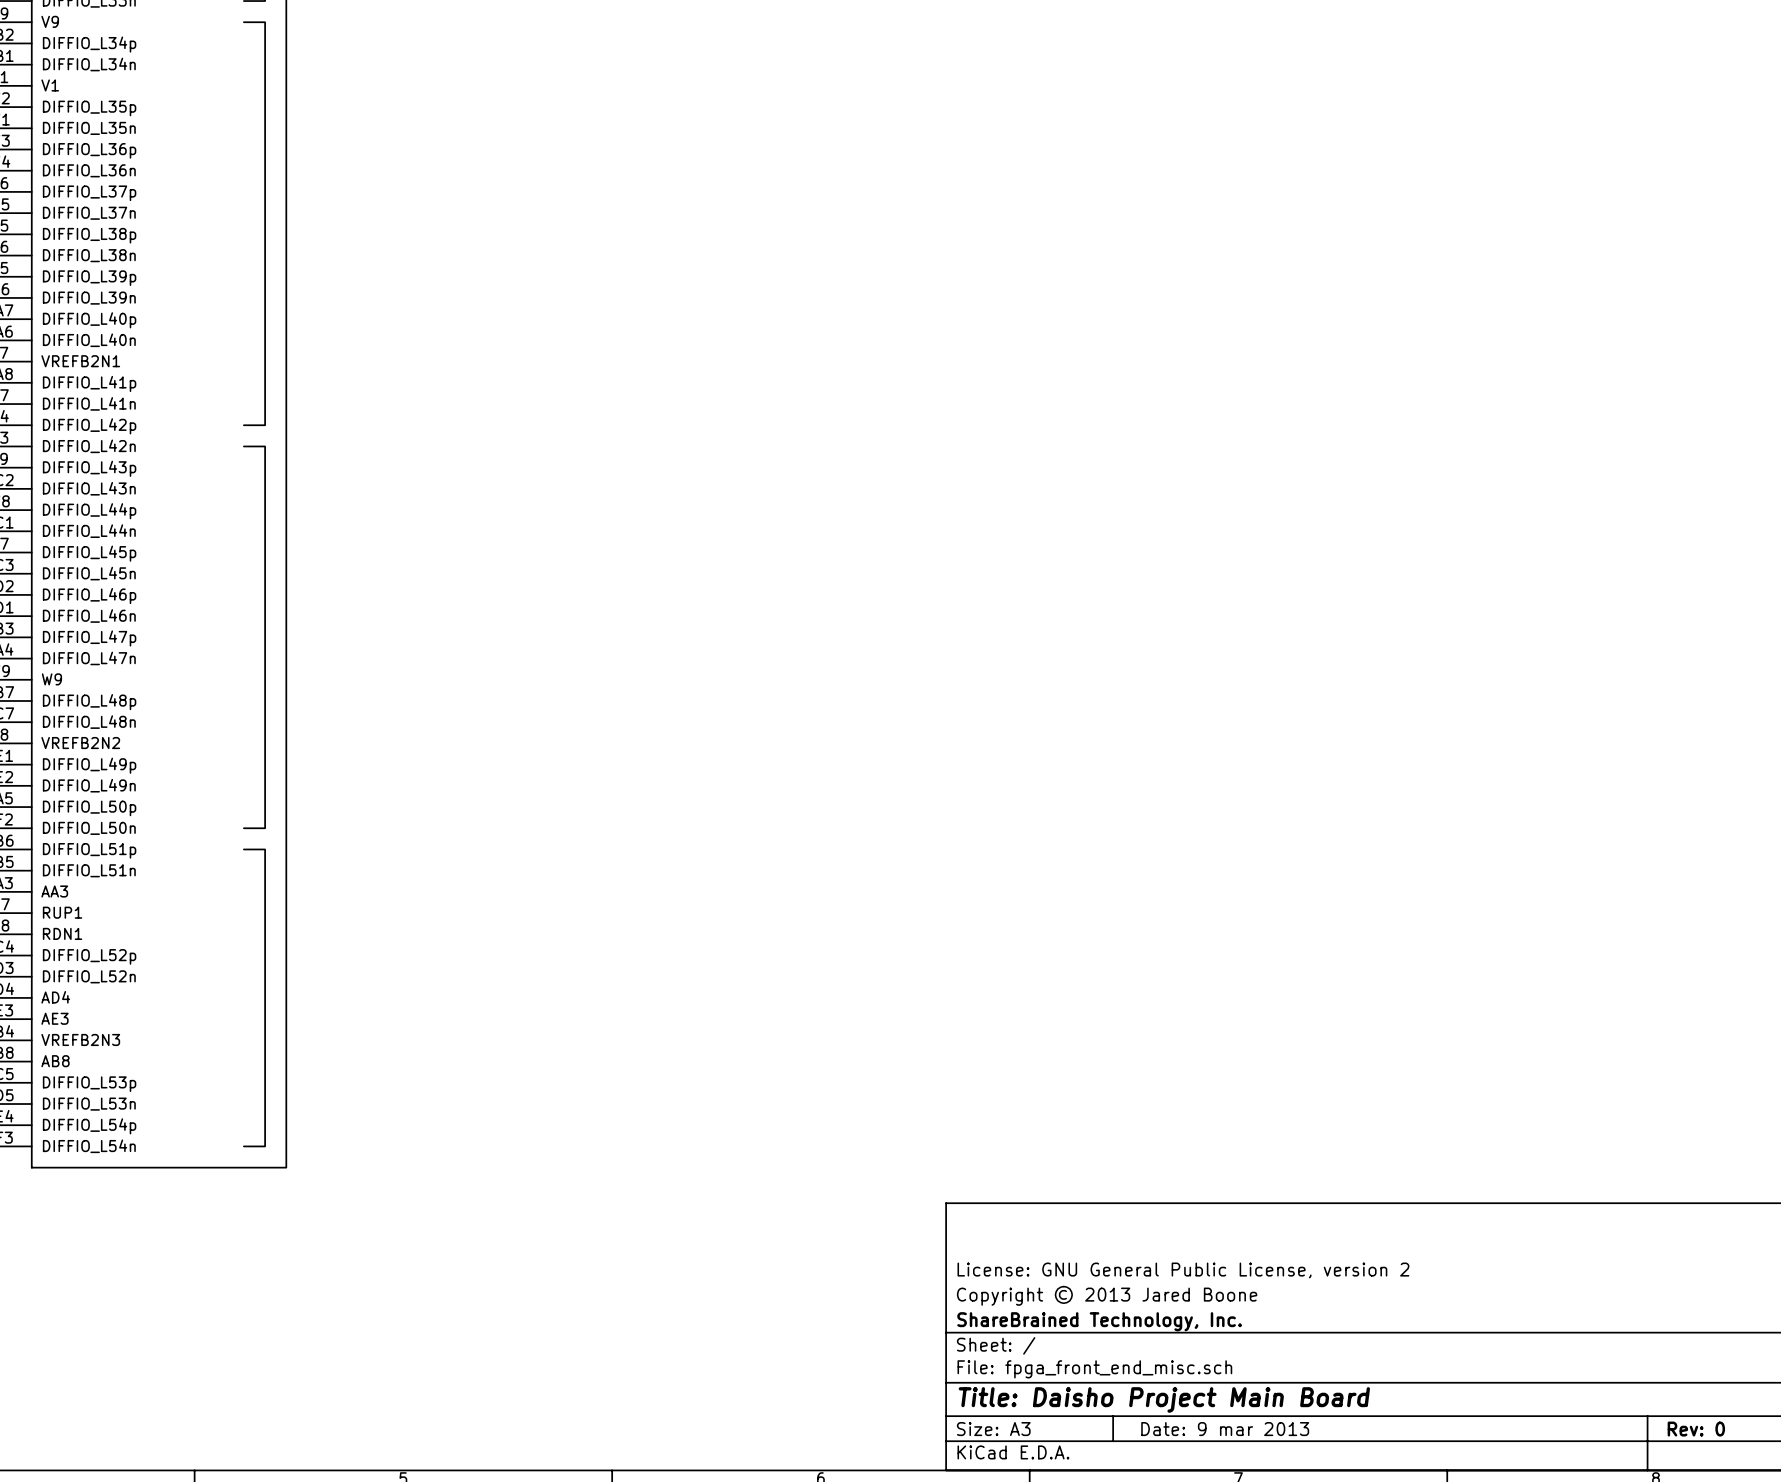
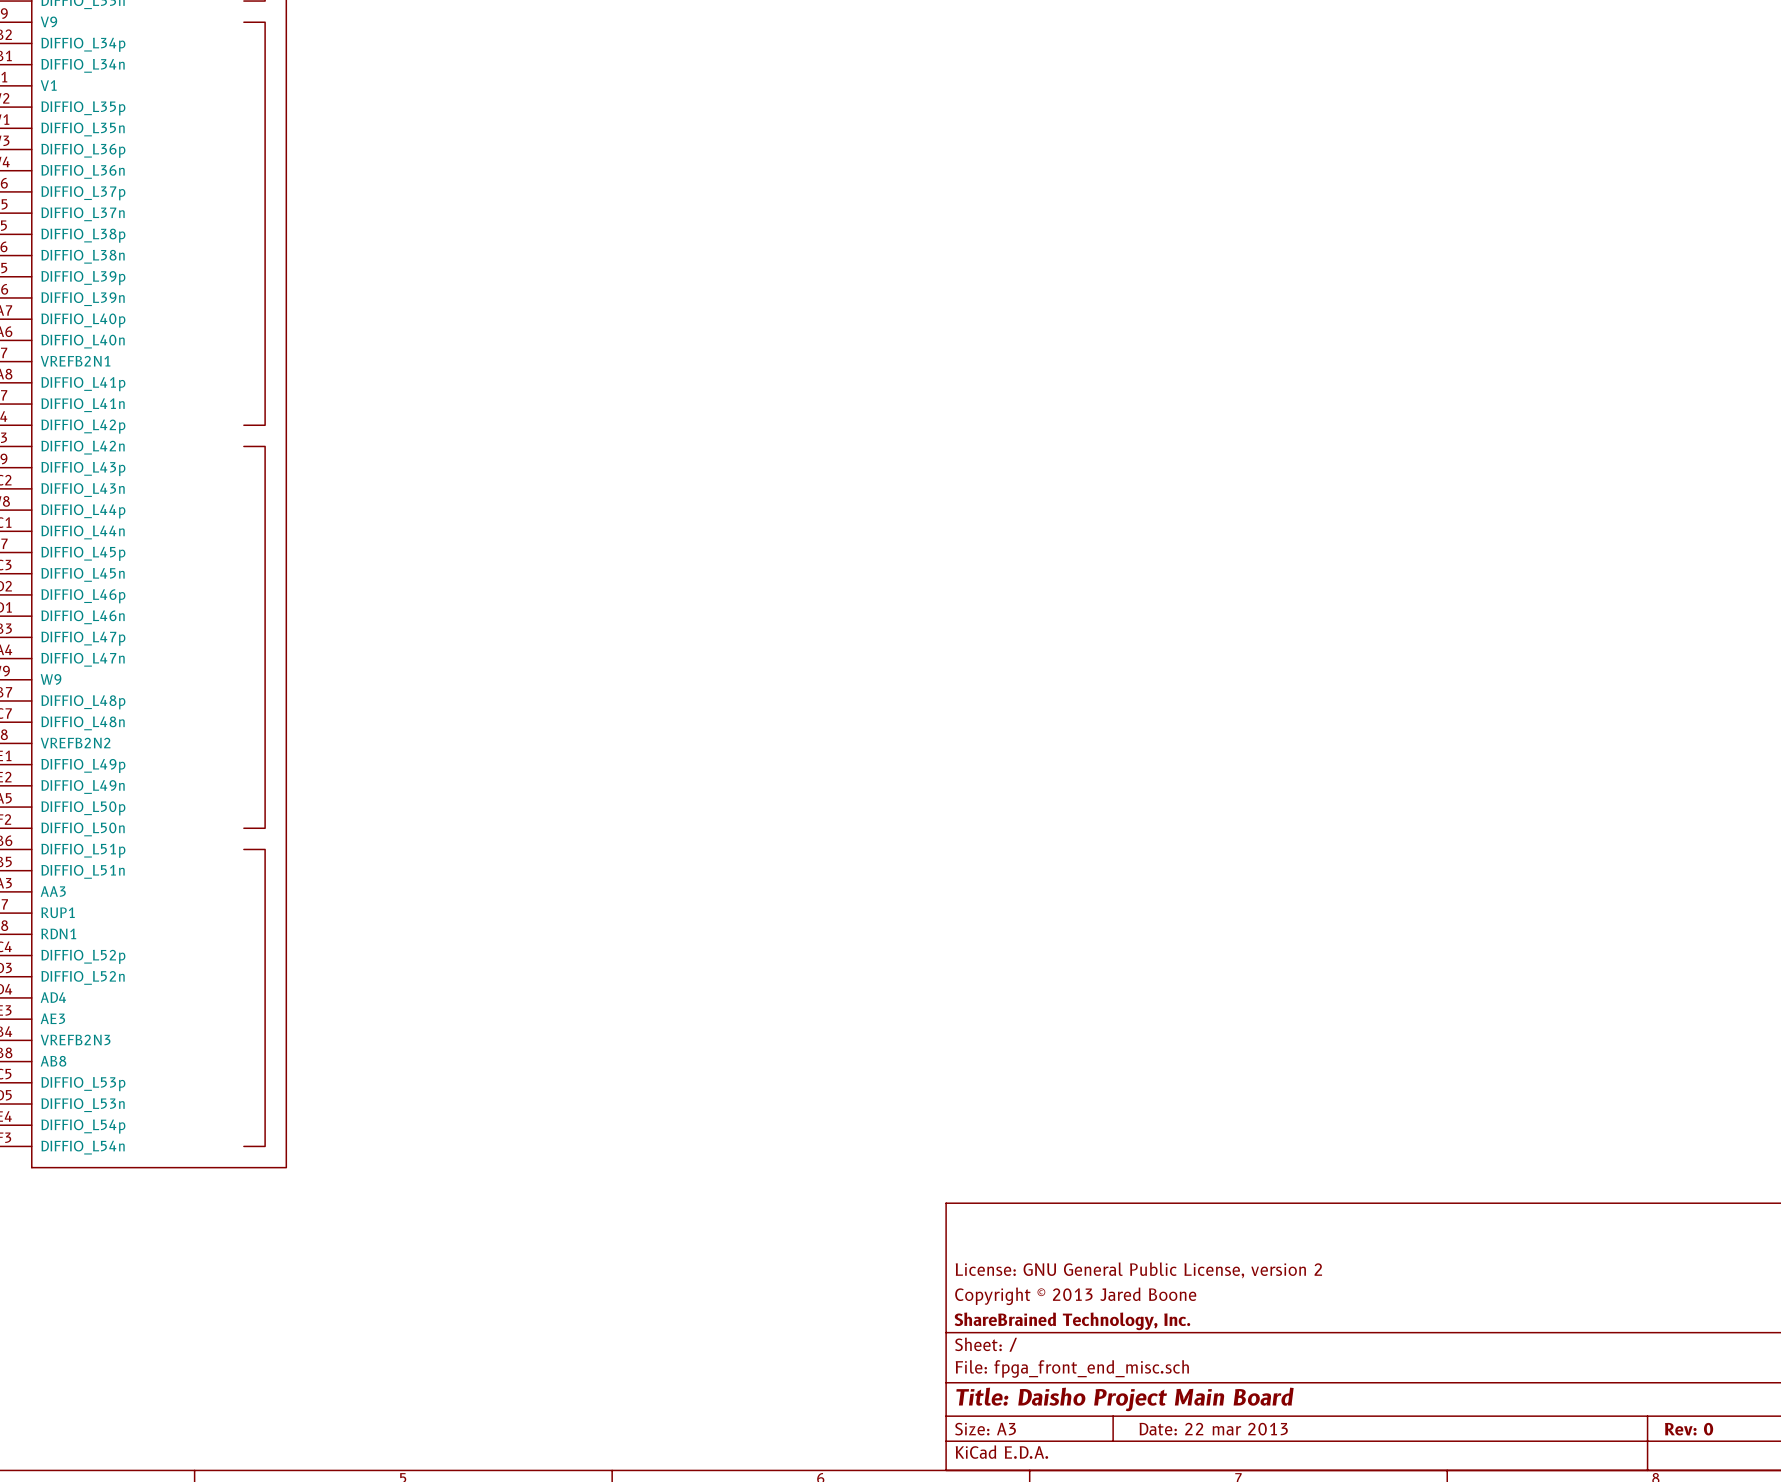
title block: Date: 9 mar 2013 (1225, 1429) -> Date: 22 mar 2013 (1213, 1429)

